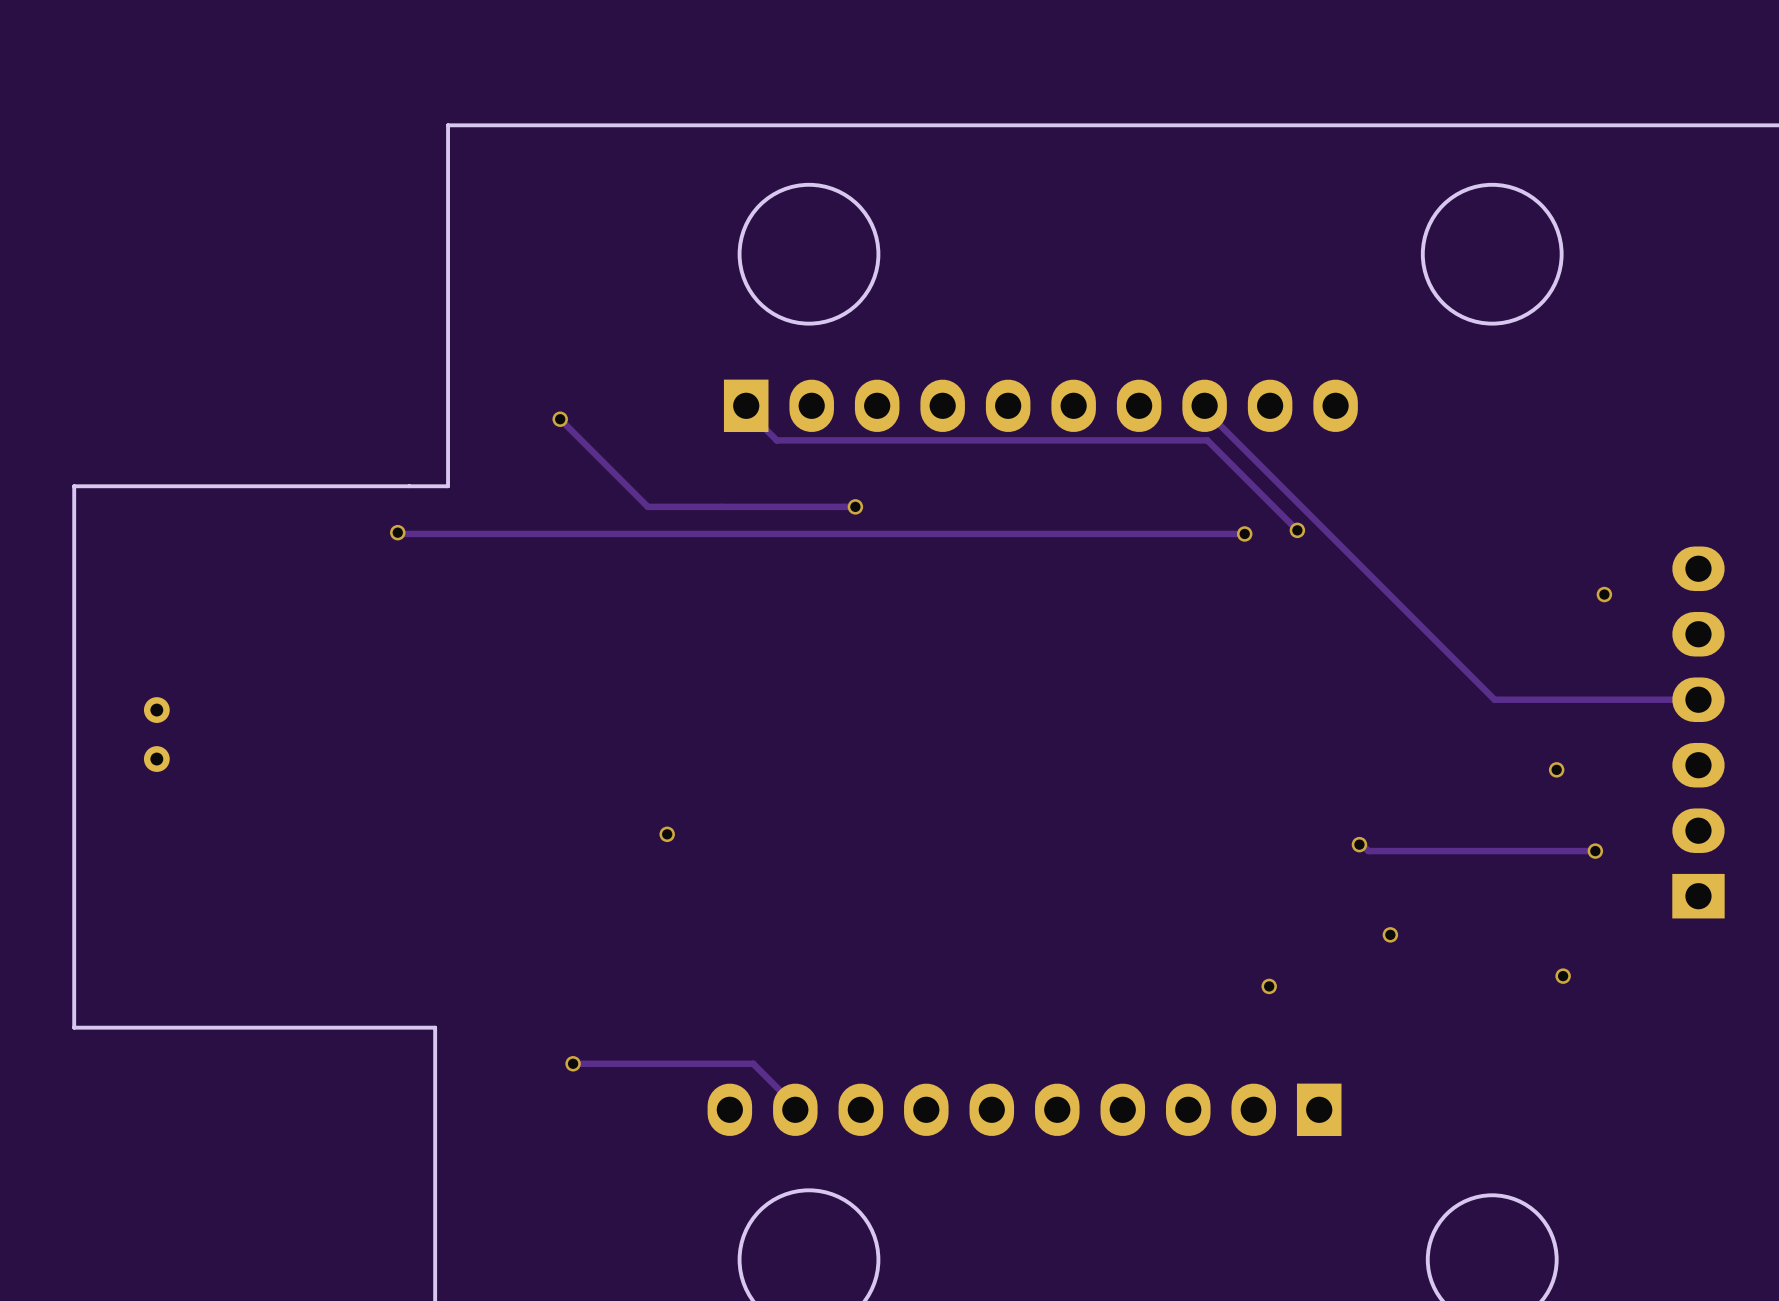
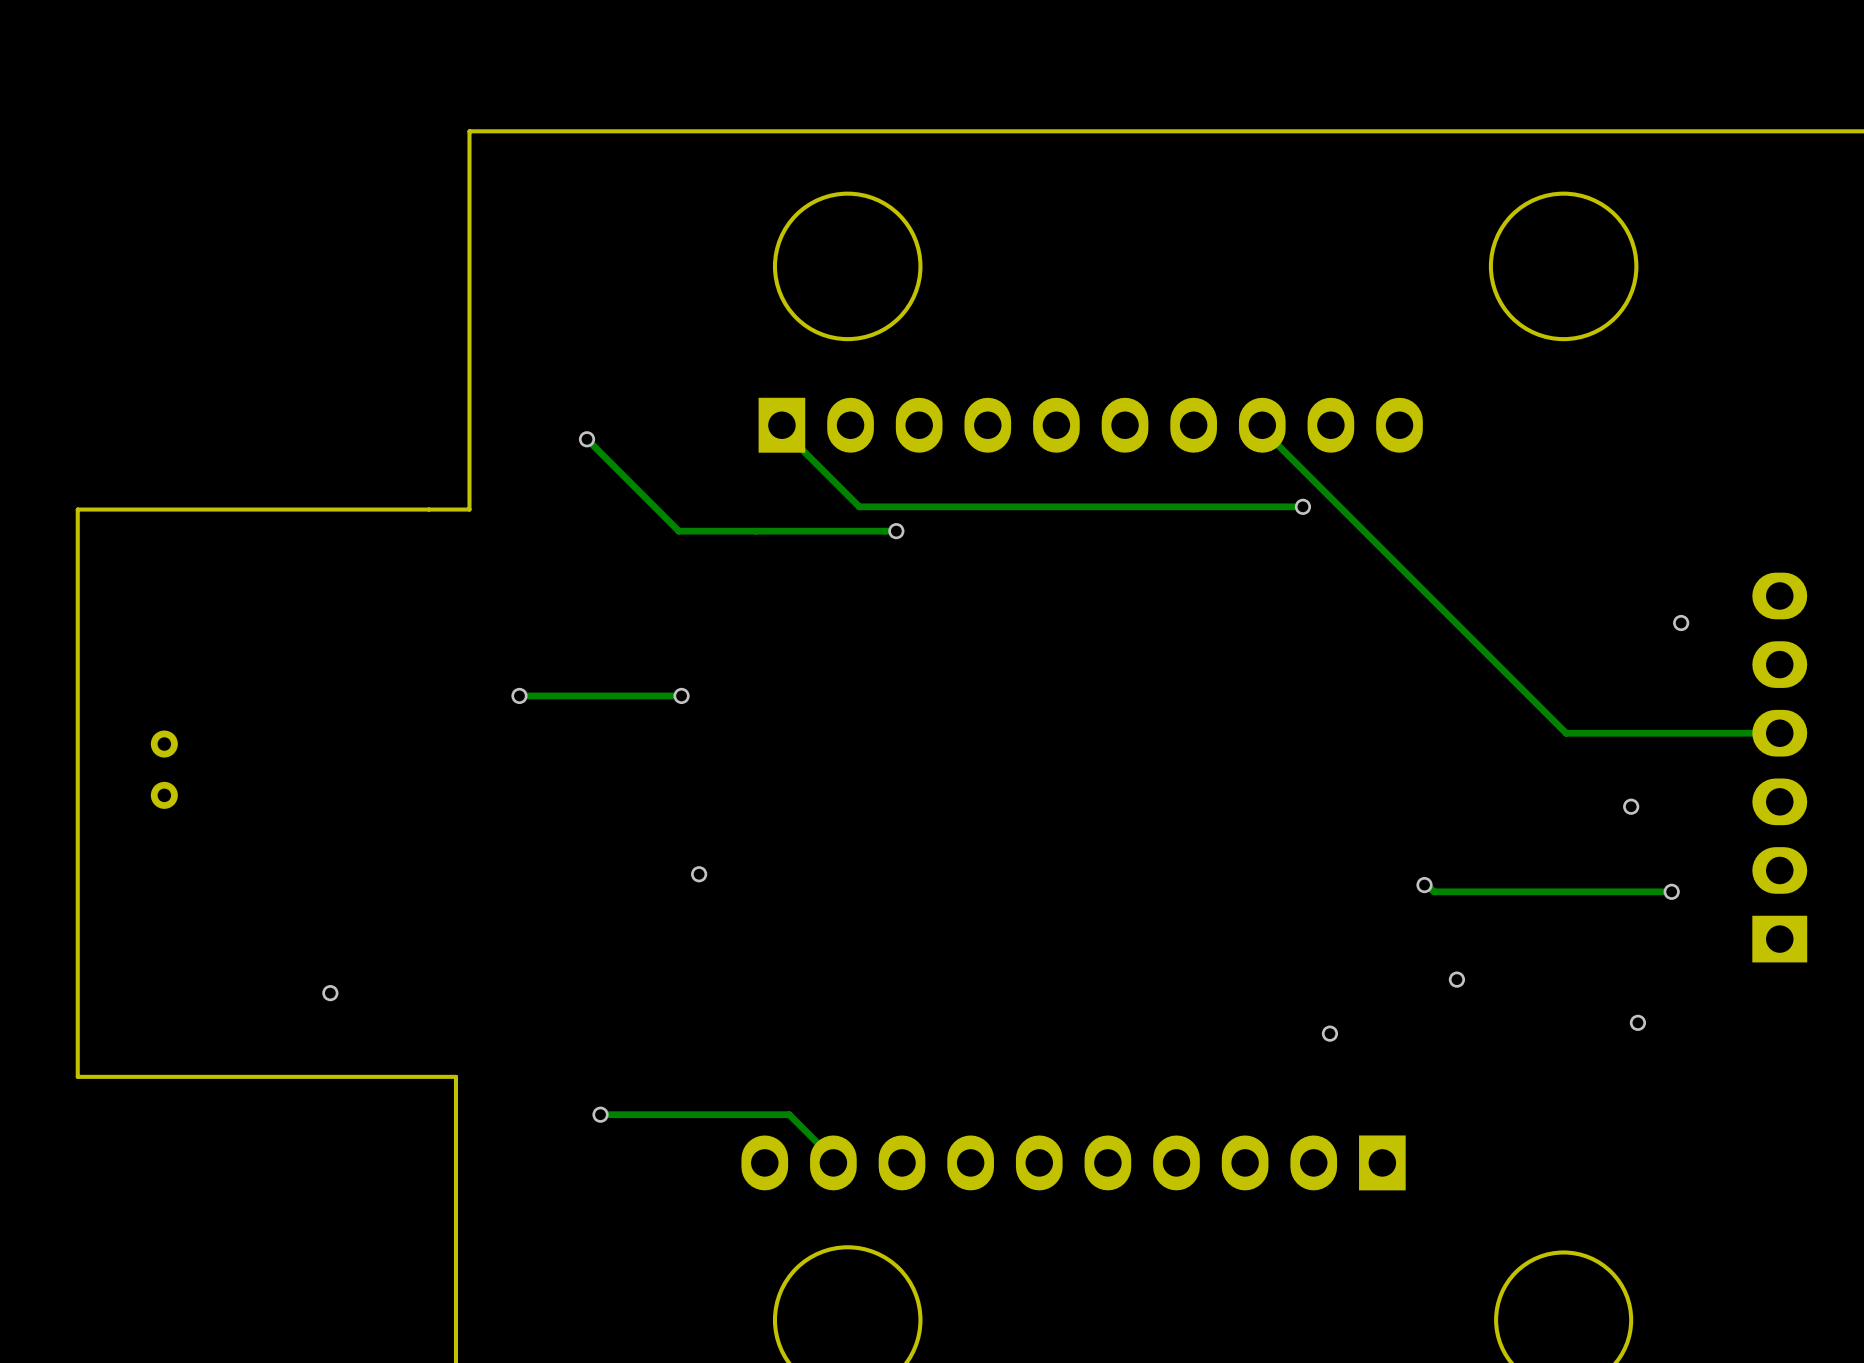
track: (776, 440) (1207, 440) (1297, 530) -> (814, 461) (859, 506) (1302, 506)
via: none -> (1302, 506)
via: (1297, 530) -> none
track: (397, 532) (1244, 533) -> none
via: (397, 532) -> none
via: (1244, 533) -> none
via: none -> (519, 695)
track: none -> (681, 695) (519, 695)
via: none -> (681, 695)
via: none -> (330, 993)

